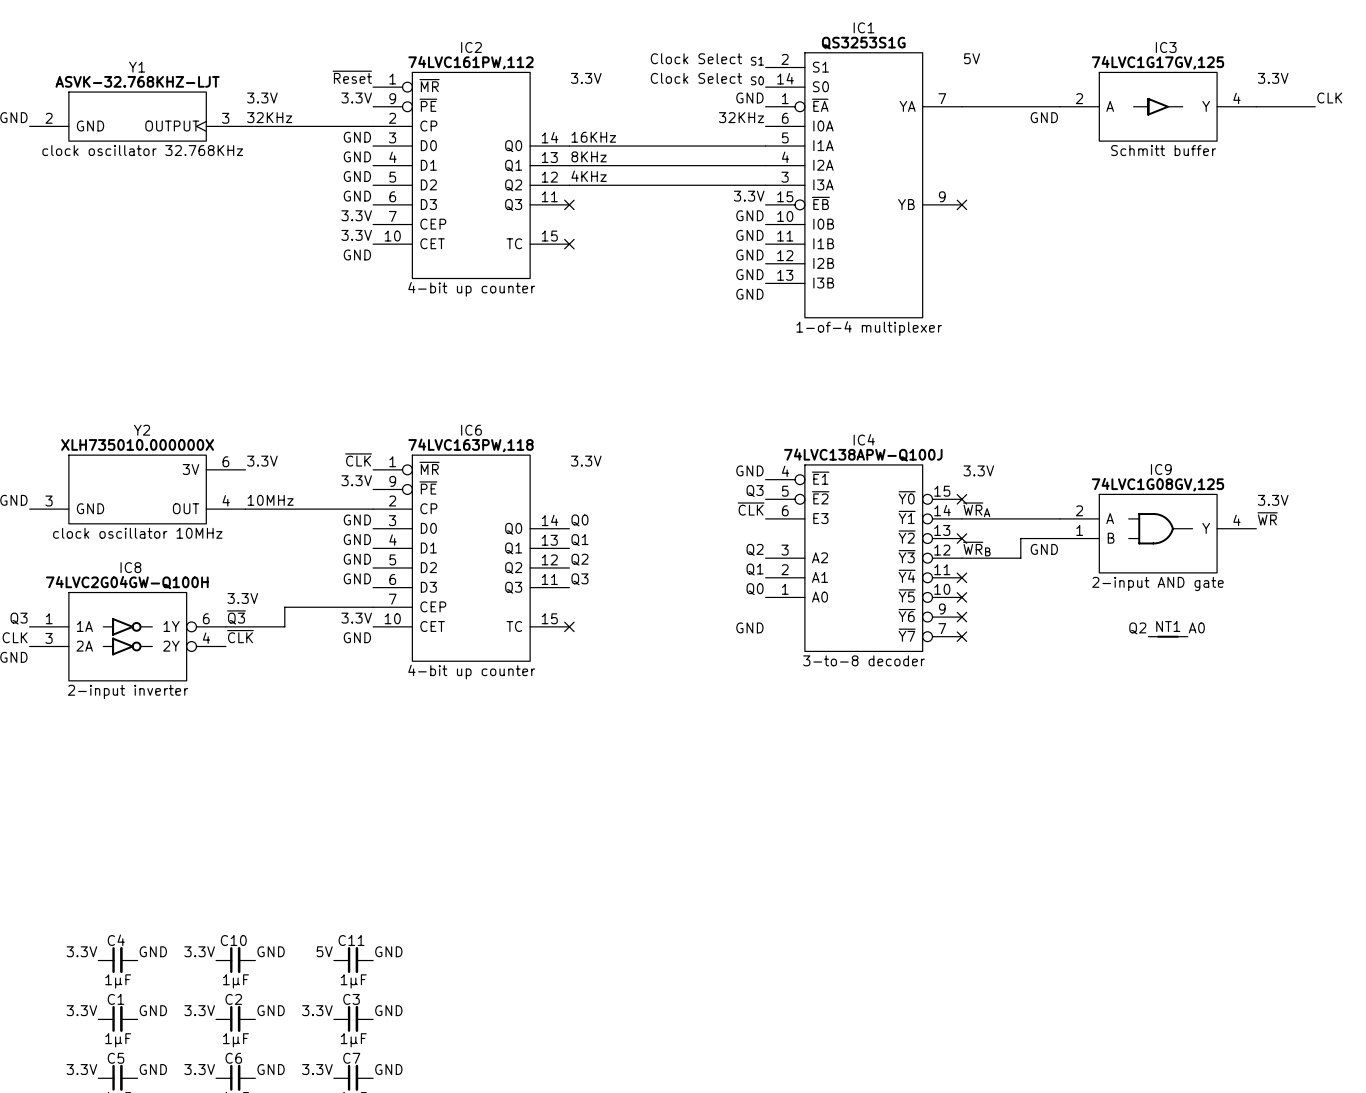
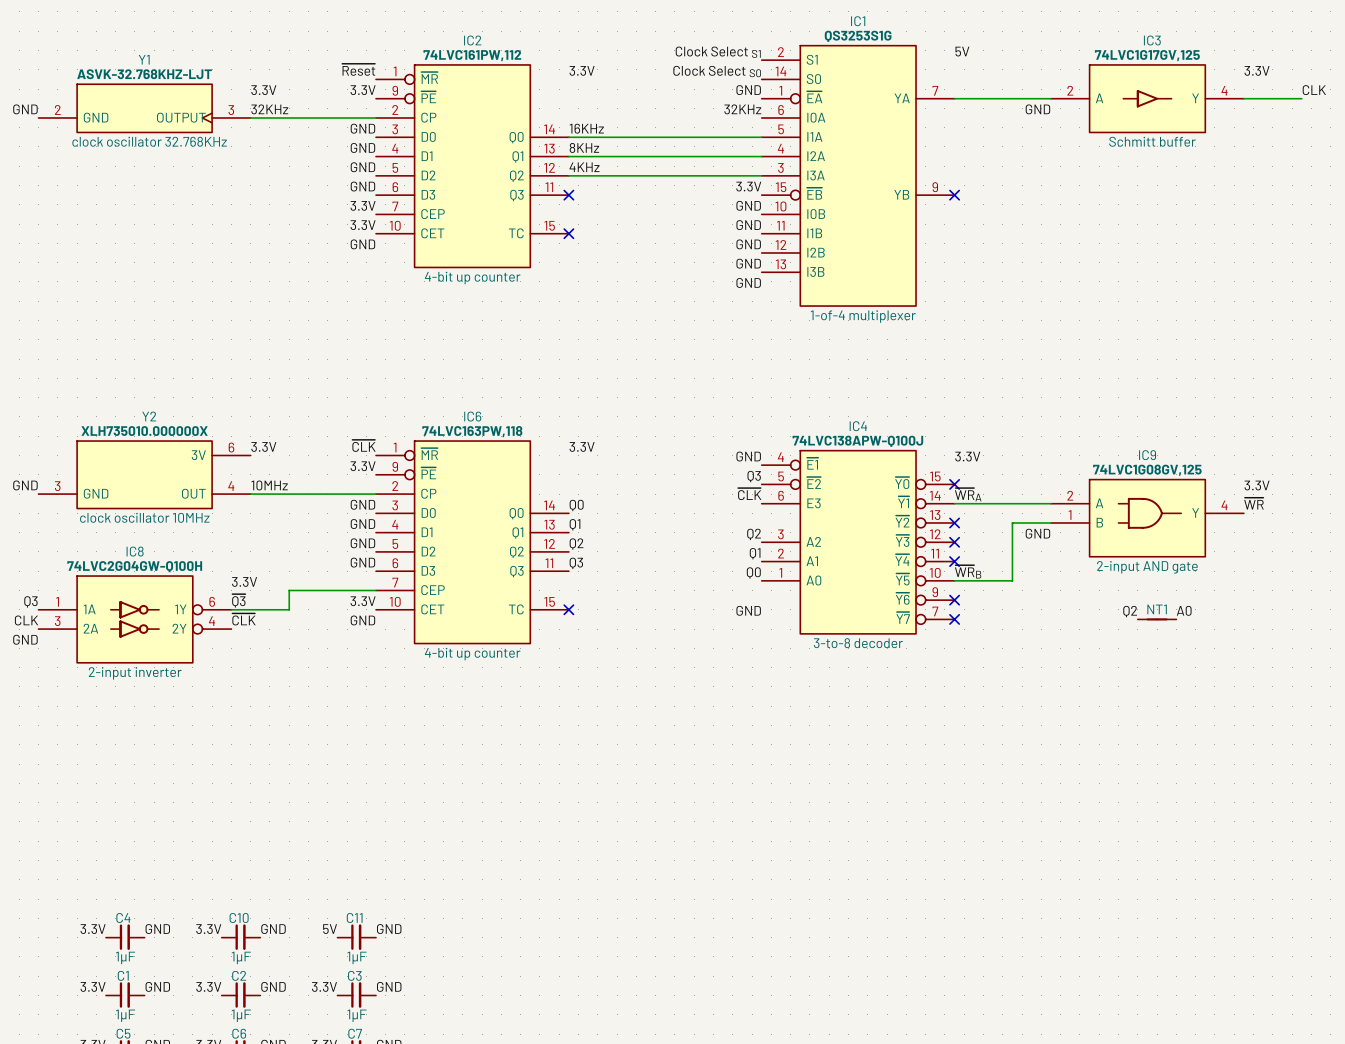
label position: ~{WR}B (976, 549) -> ~{WR}B (968, 571)
wire: (961, 558) (1020, 558) -> (954, 580) (1012, 580) (1012, 542)
no-connect mark position: (961, 597) -> (954, 542)

